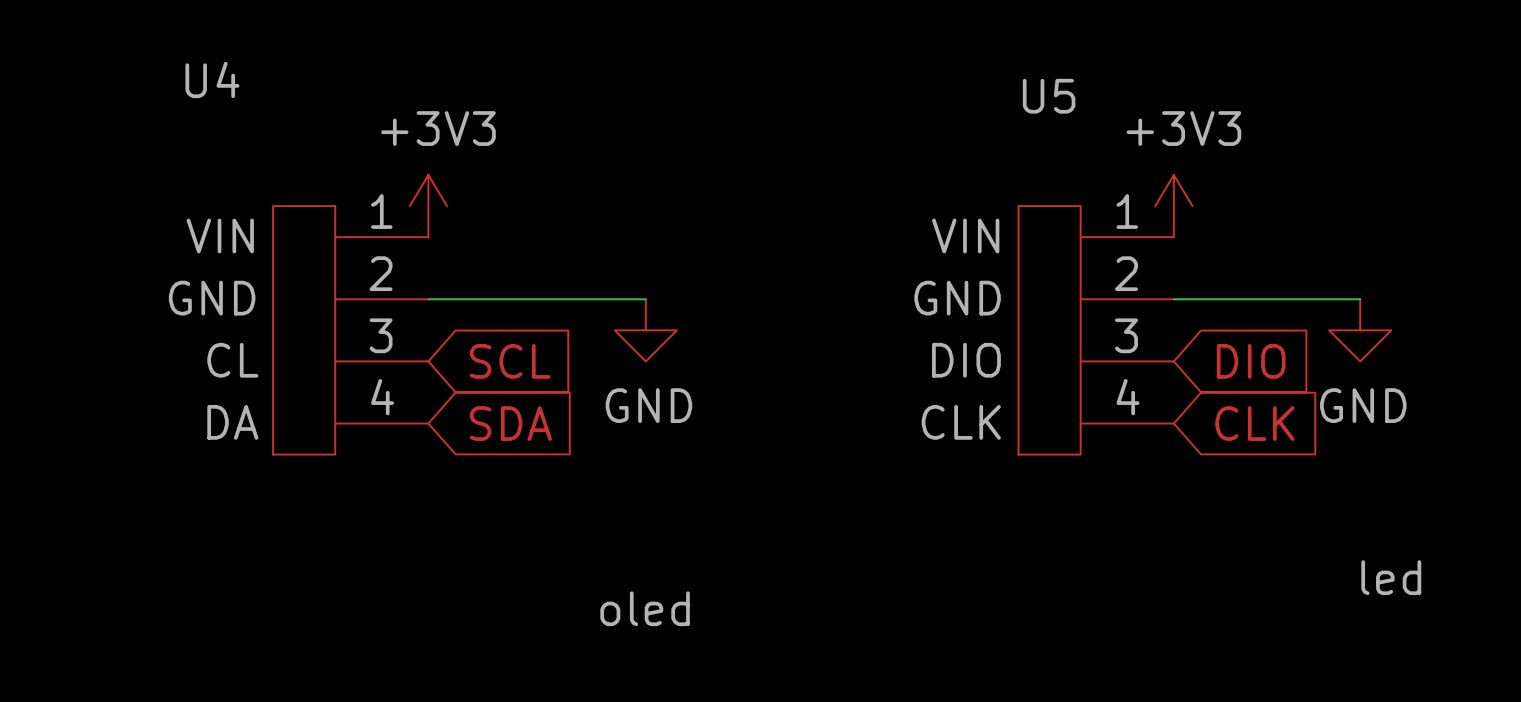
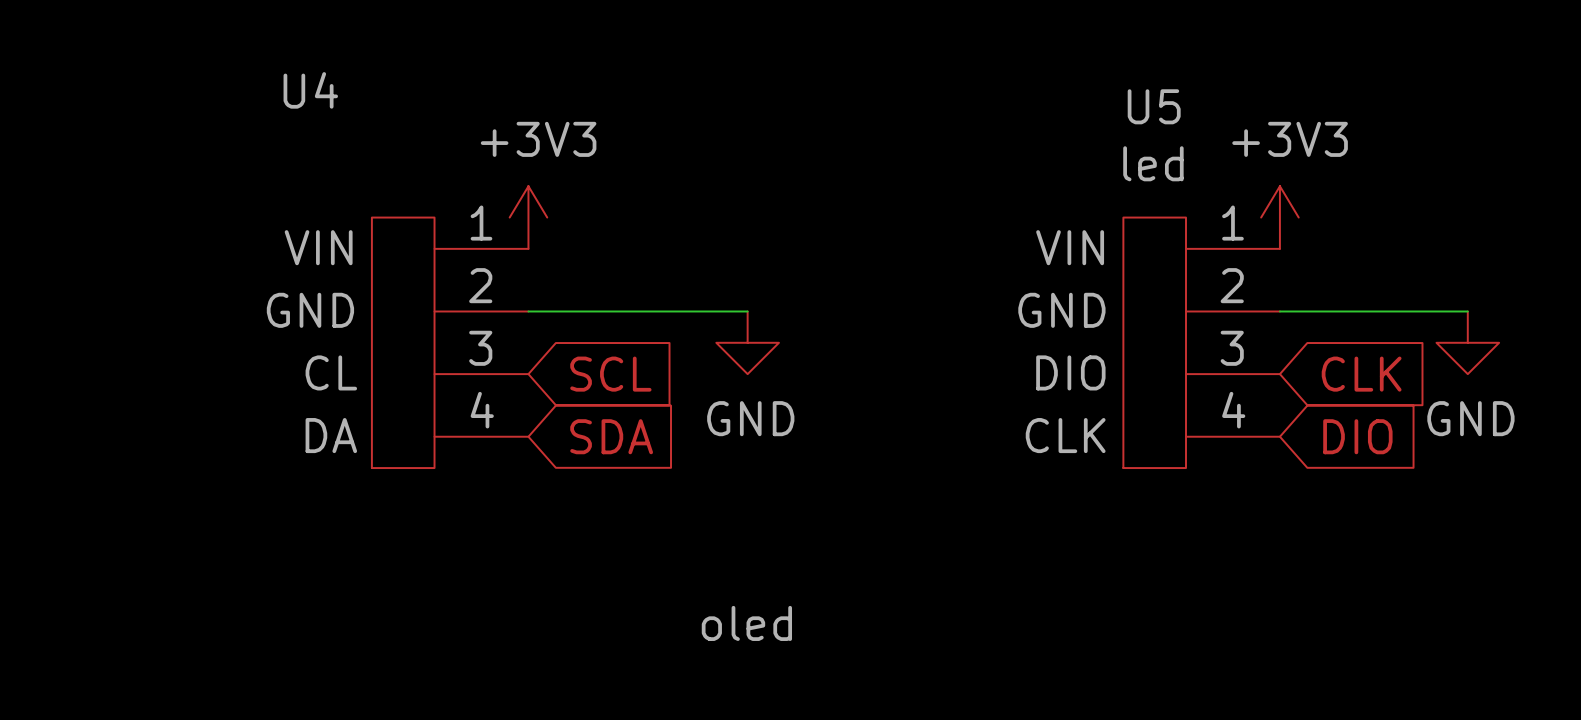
global label: DIO (1251, 361) -> CLK (1361, 374)
global label: CLK (1254, 423) -> DIO (1357, 436)
U5 value position: led (1391, 577) -> led (1153, 163)

